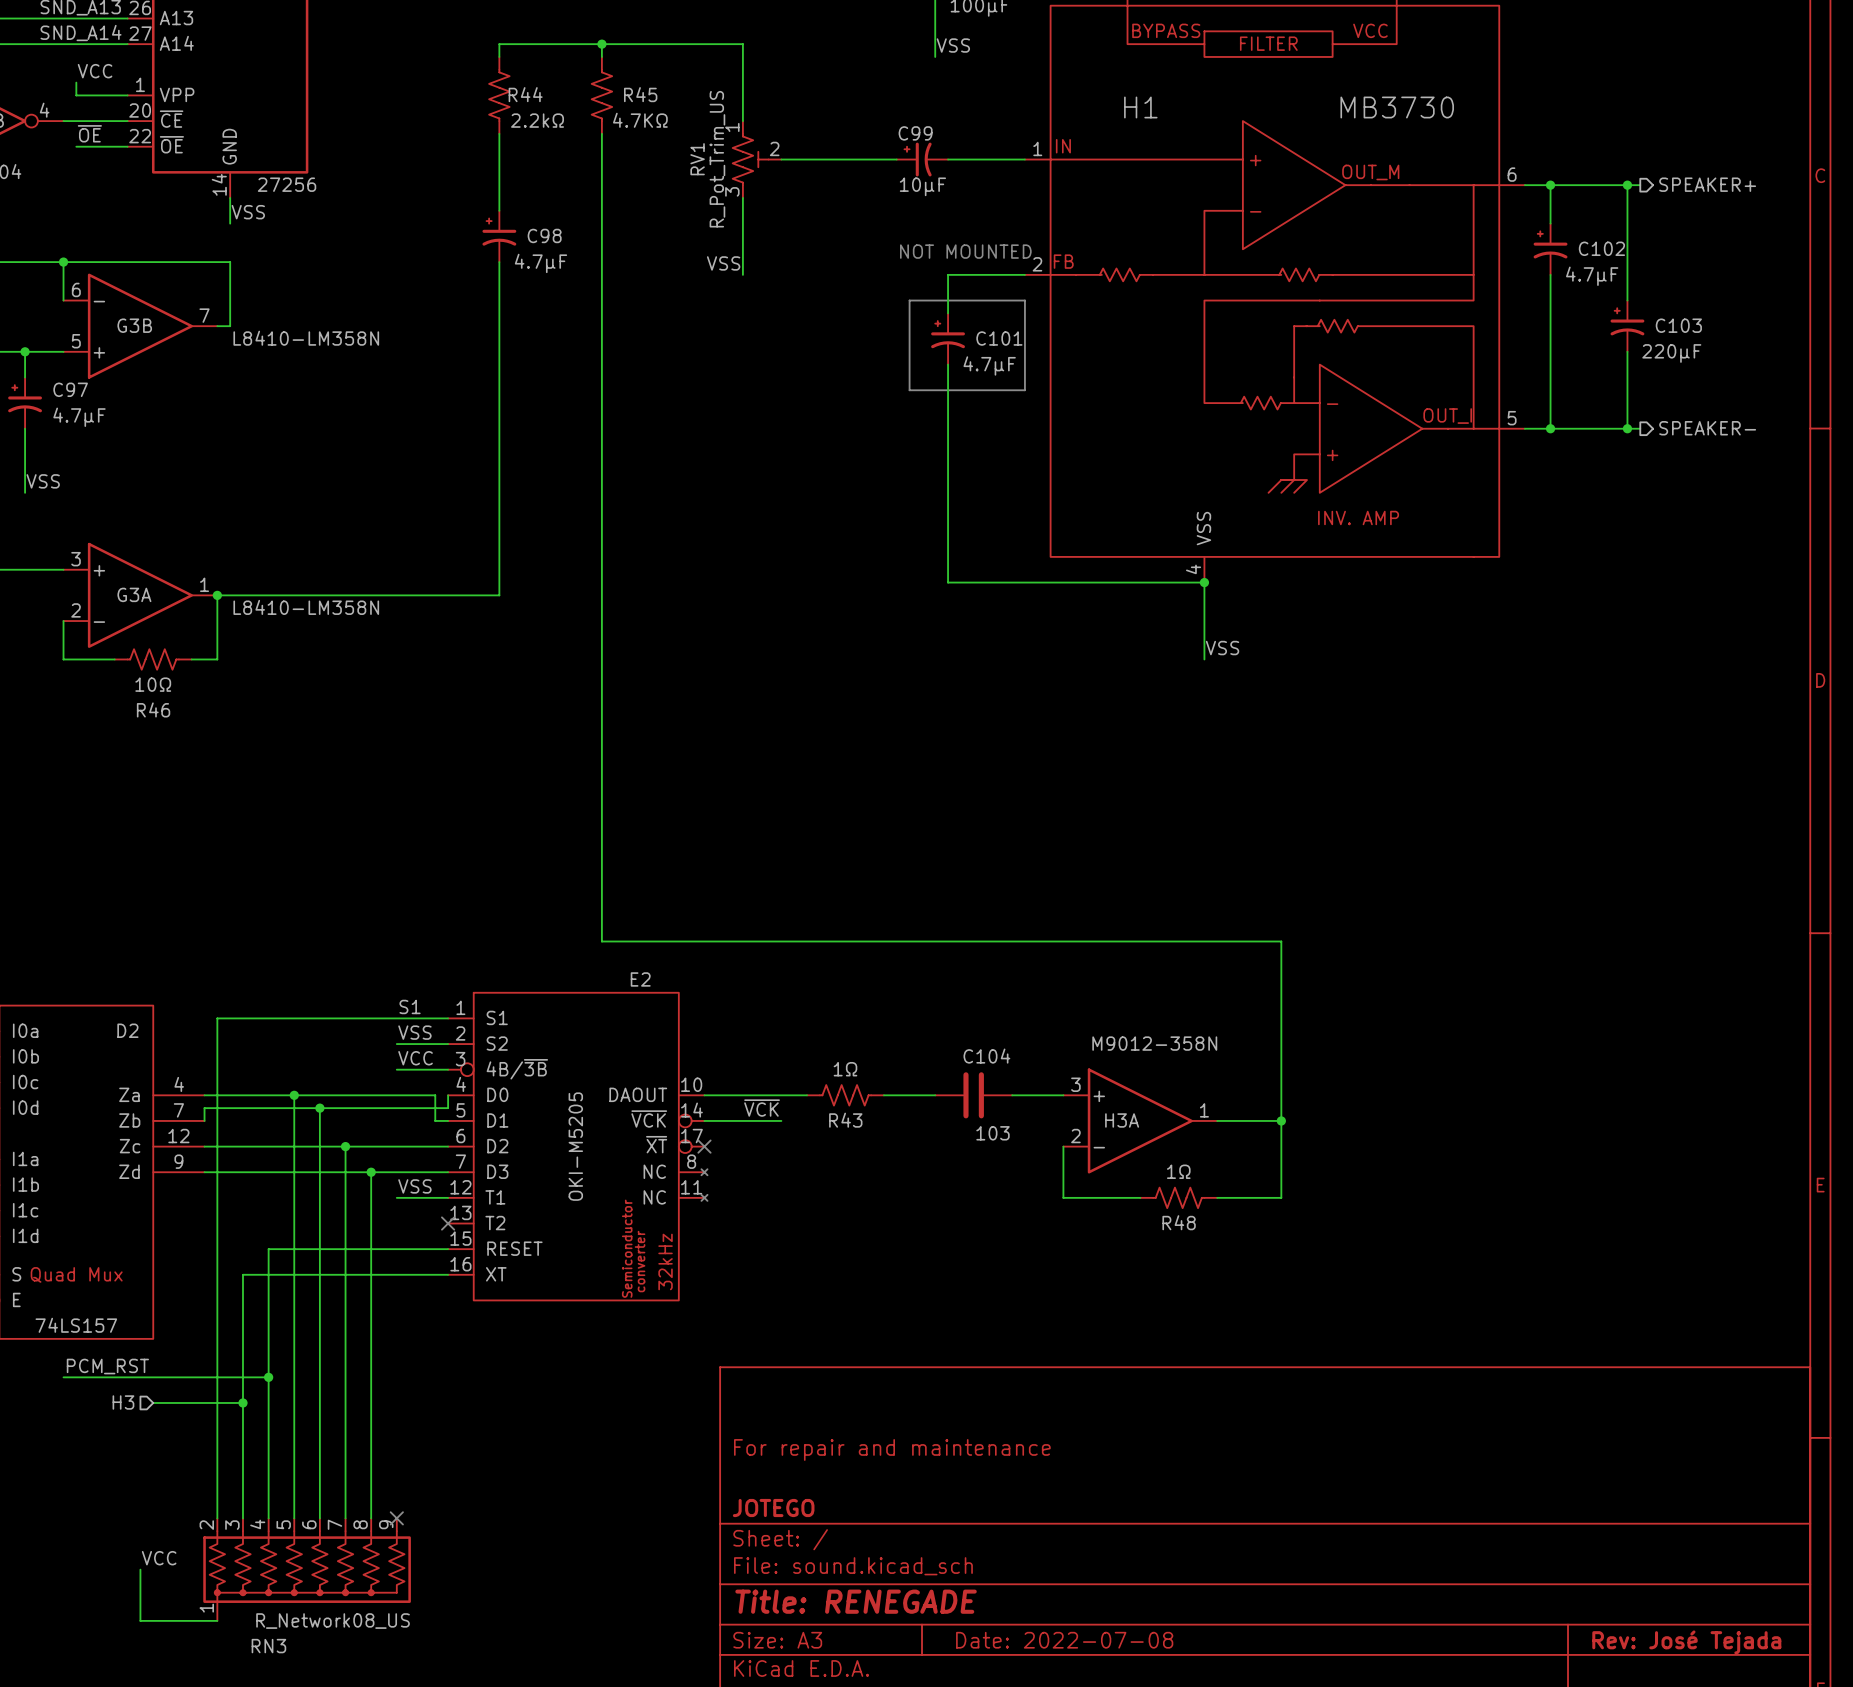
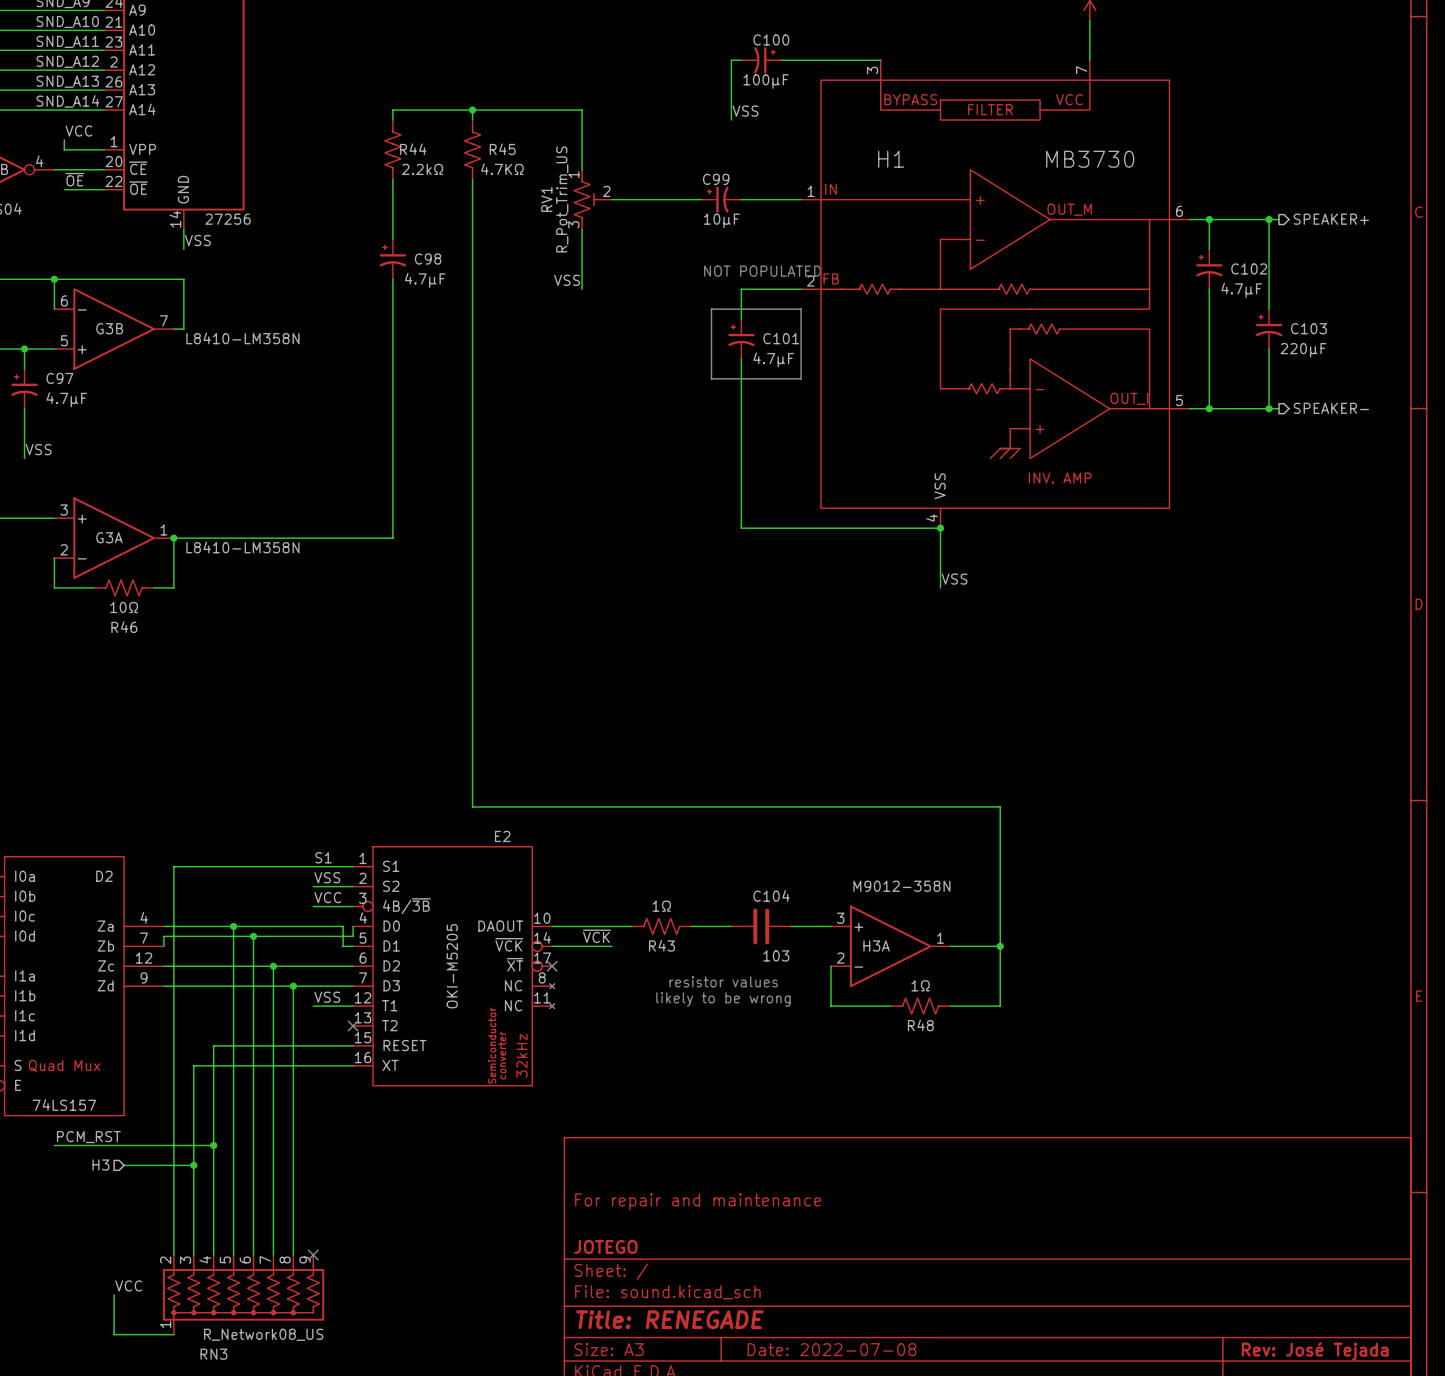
text: NOT MOUNTED (965, 251) -> NOT POPULATED (762, 271)
text: none -> resistor values (723, 981)
text: none -> likely to be wrong (723, 999)

